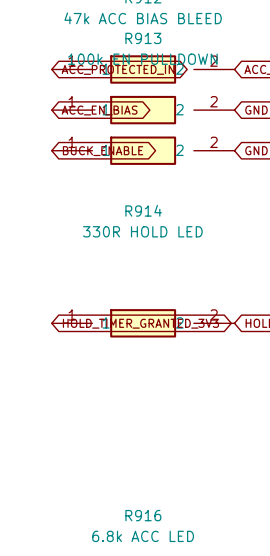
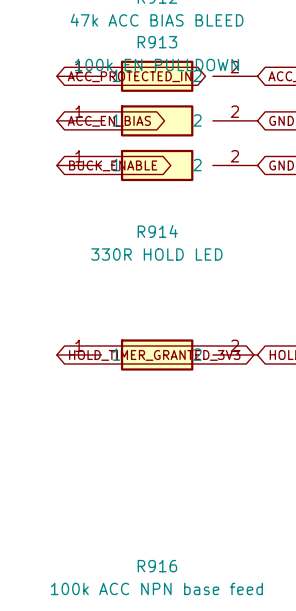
R916 value: 6.8k ACC LED (143, 536) -> 100k ACC NPN base feed (156, 588)

